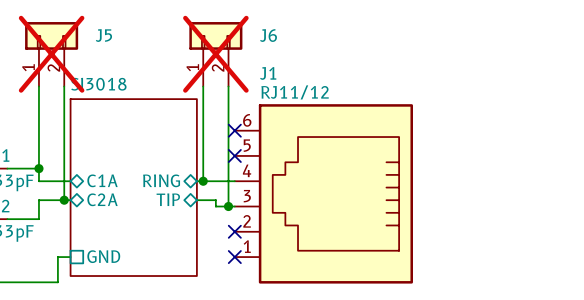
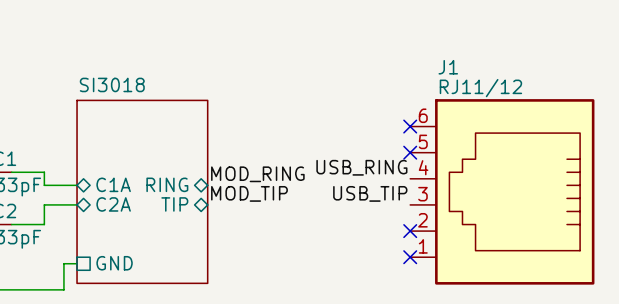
J5: (51, 54) -> none
J6: (215, 54) -> none
wire: (38, 86) (38, 168) -> none
wire: (64, 86) (64, 200) -> none
wire: (203, 86) (203, 181) -> none
wire: (228, 86) (228, 206) -> none
no-connect mark: none -> (410, 126)
no-connect mark: (234, 130) -> none
no-connect mark: none -> (410, 152)
no-connect mark: (234, 155) -> none
label: none -> USB_RING (361, 167)
junction: (38, 168) -> none
label: none -> MOD_RING (257, 174)
wire: (196, 181) (234, 181) -> none
junction: (203, 181) -> none
label: none -> MOD_TIP (249, 193)
label: none -> USB_TIP (370, 193)
J1 position: (323, 193) -> (502, 191)
junction: (64, 200) -> none
wire: (196, 200) (215, 200) (215, 206) (234, 206) -> none
junction: (228, 206) -> none
no-connect mark: none -> (410, 231)
no-connect mark: (234, 231) -> none
no-connect mark: none -> (410, 257)
no-connect mark: (234, 257) -> none

